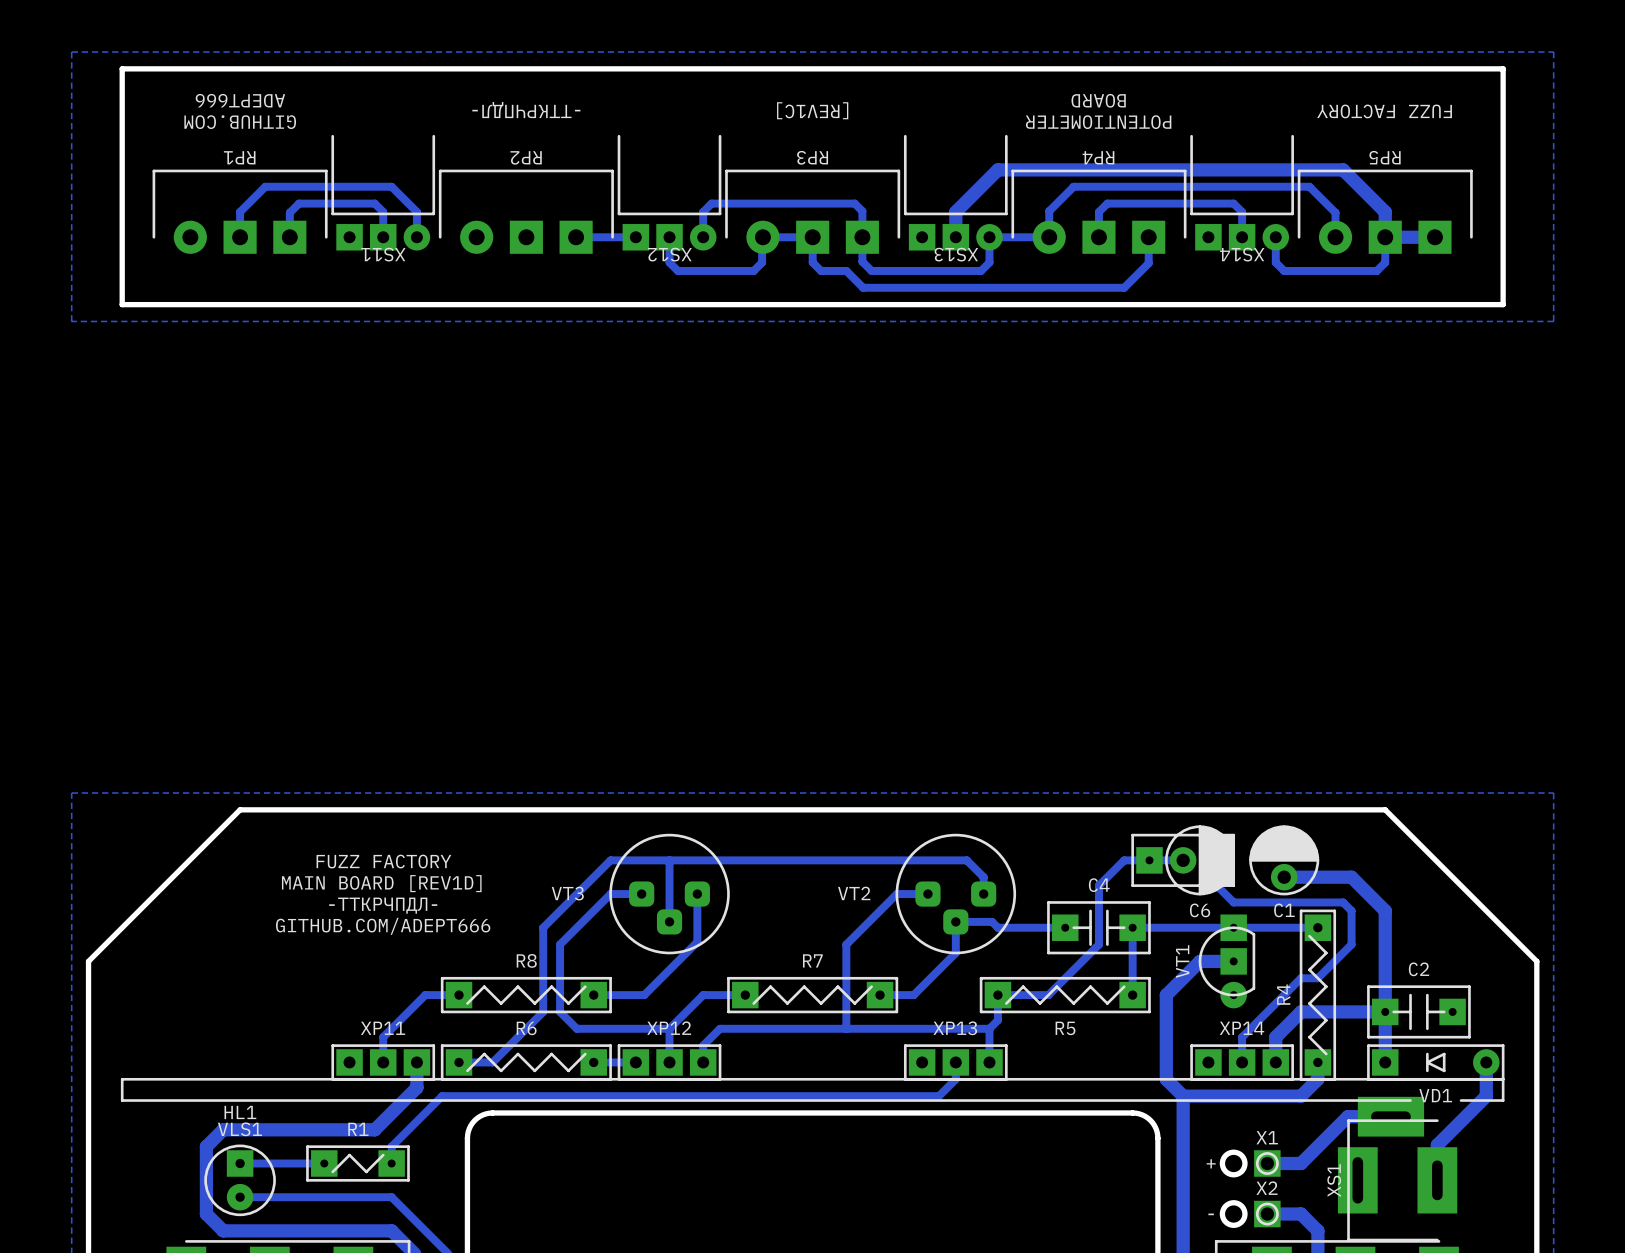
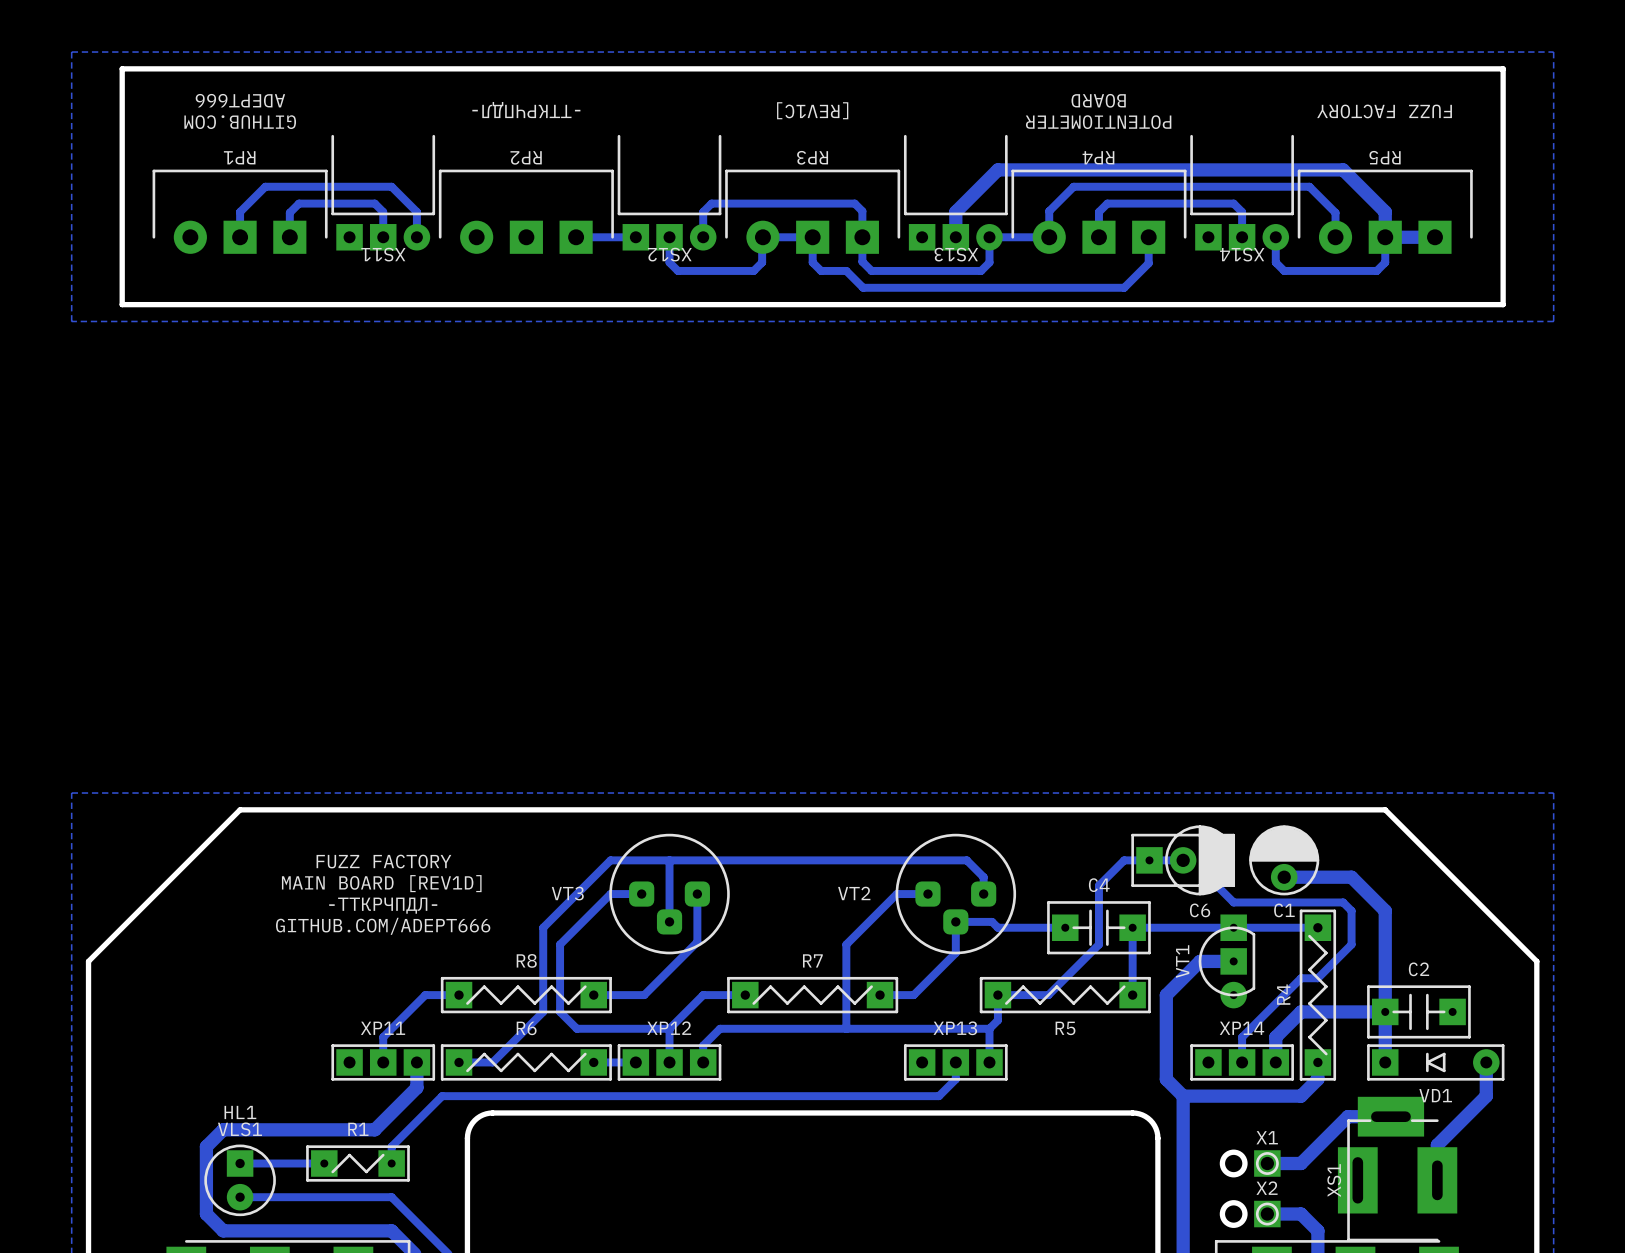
XS1 footprint: [1337, 1096, 1458, 1242] -> [1337, 1096, 1458, 1242]
line: (1410, 1100) (122, 1100) (122, 1079) (1503, 1079) (1503, 1100) (1461, 1100) -> none
text: + (1211, 1163) -> none
text: - (1211, 1214) -> none

